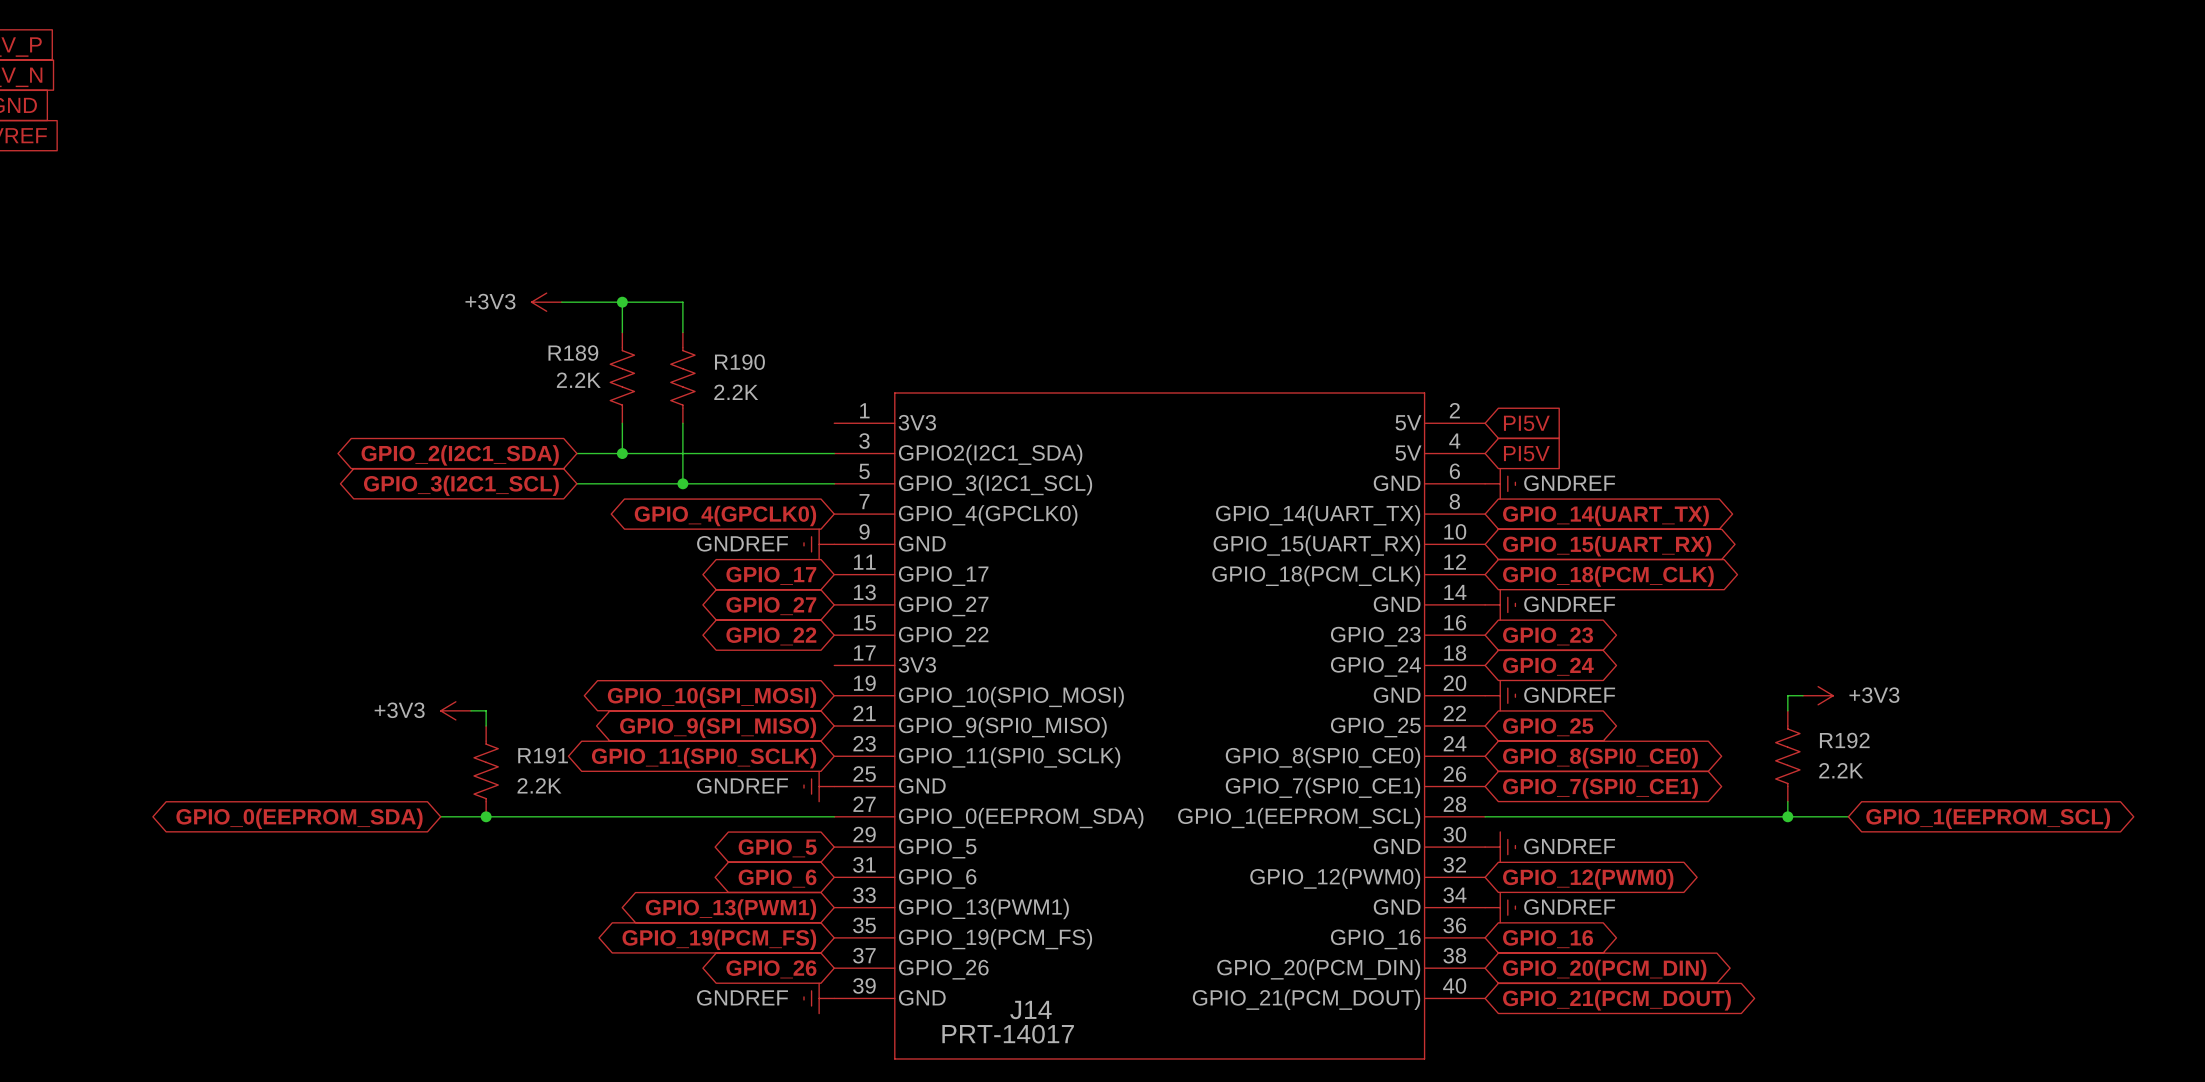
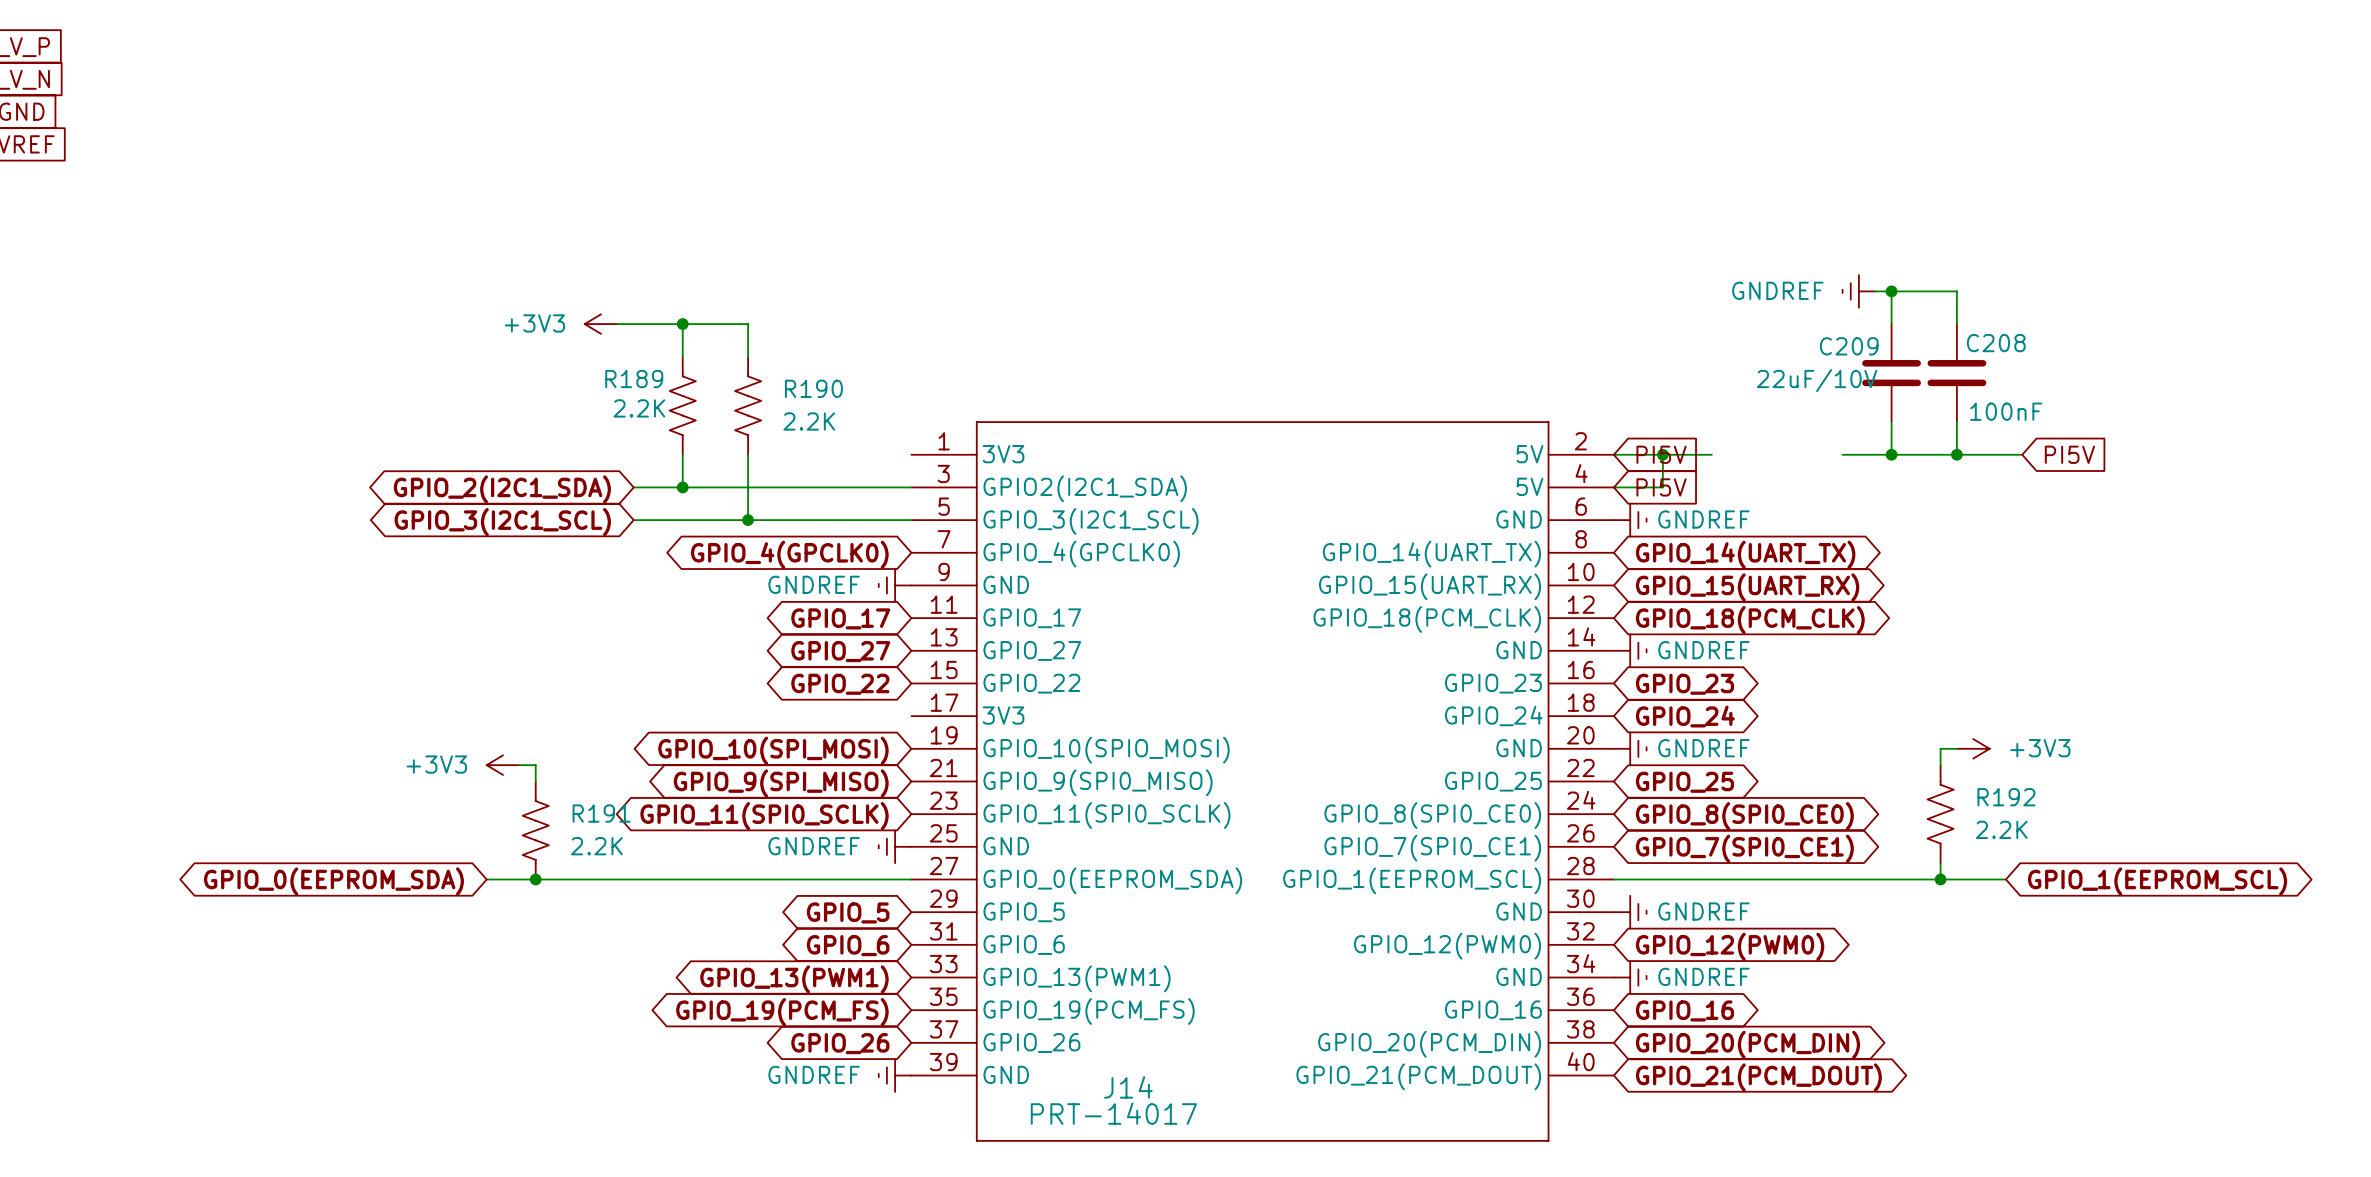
power symbol: none -> GNDREF (1858, 291)
wire: none -> (1875, 291) (1956, 291) (1956, 324)
wire: none -> (1891, 291) (1891, 324)
junction: none -> (1891, 291)
C209: none -> 22uF/10V (1891, 373)
C208: none -> 100nF (1956, 373)
wire: none -> (1891, 422) (1891, 454)
wire: none -> (1956, 422) (1956, 454)
wire: none -> (1613, 454) (1711, 454)
wire: none -> (1662, 454) (1662, 487) (1613, 487)
junction: none -> (1662, 454)
wire: none -> (1842, 454) (2022, 454)
junction: none -> (1891, 454)
junction: none -> (1956, 454)
global label: none -> PI5V (2069, 454)

